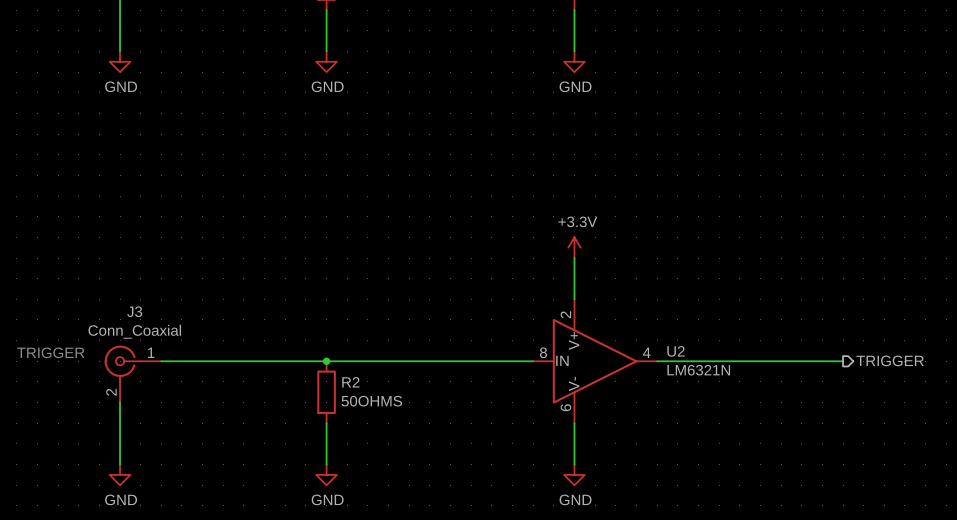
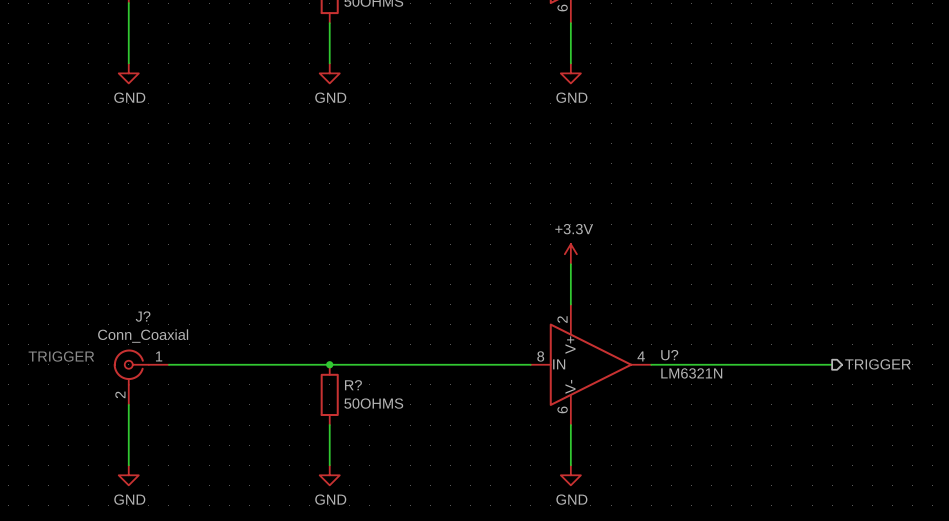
J3 name: J3 (134, 311) -> J? (143, 316)
U2 name: U2 (675, 351) -> U? (669, 355)
R2 name: R2 (350, 382) -> R? (353, 385)

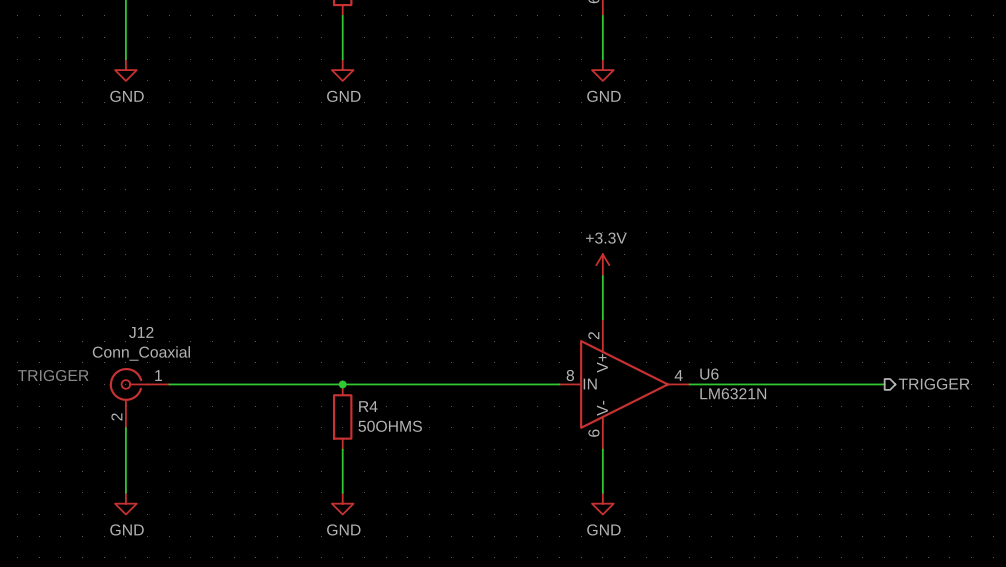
J? name: J? (143, 316) -> J12 (141, 332)
U? name: U? (669, 355) -> U6 (709, 374)
R? name: R? (353, 385) -> R4 (368, 406)

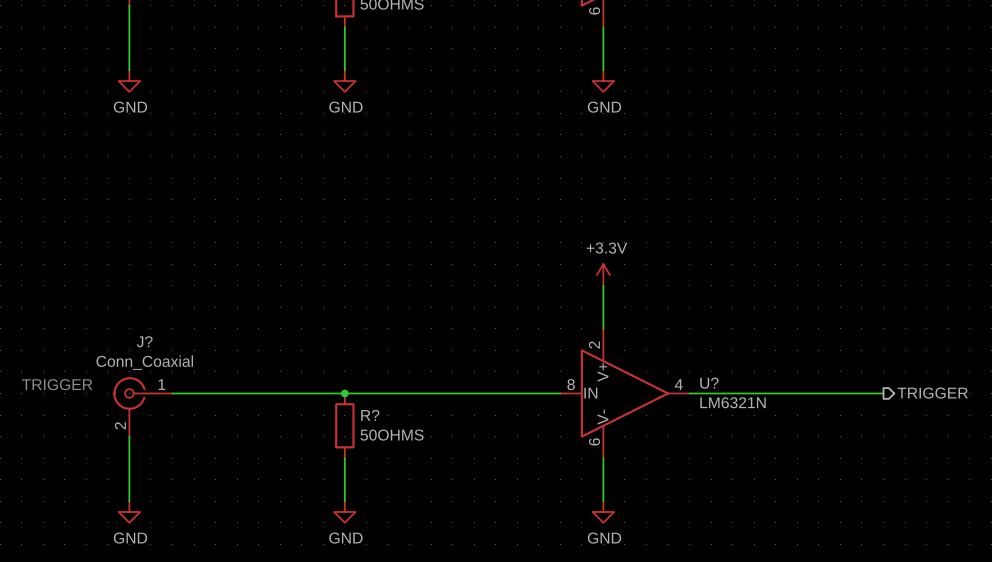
J12 name: J12 (141, 332) -> J? (144, 341)
U6 name: U6 (709, 374) -> U? (709, 383)
R4 name: R4 (368, 406) -> R? (370, 415)

